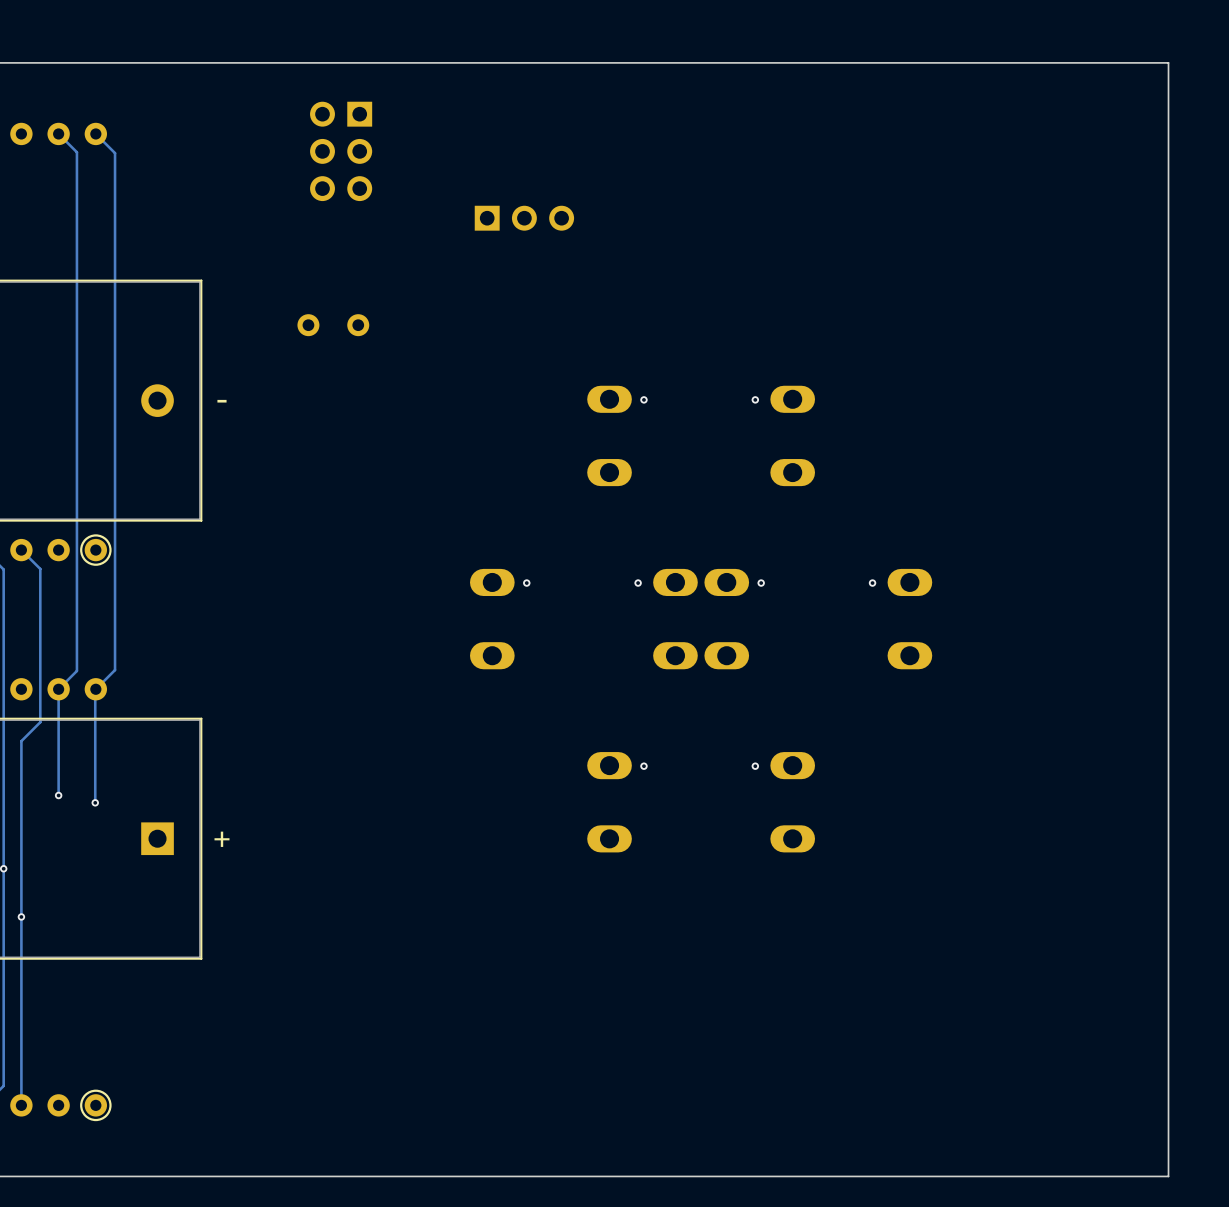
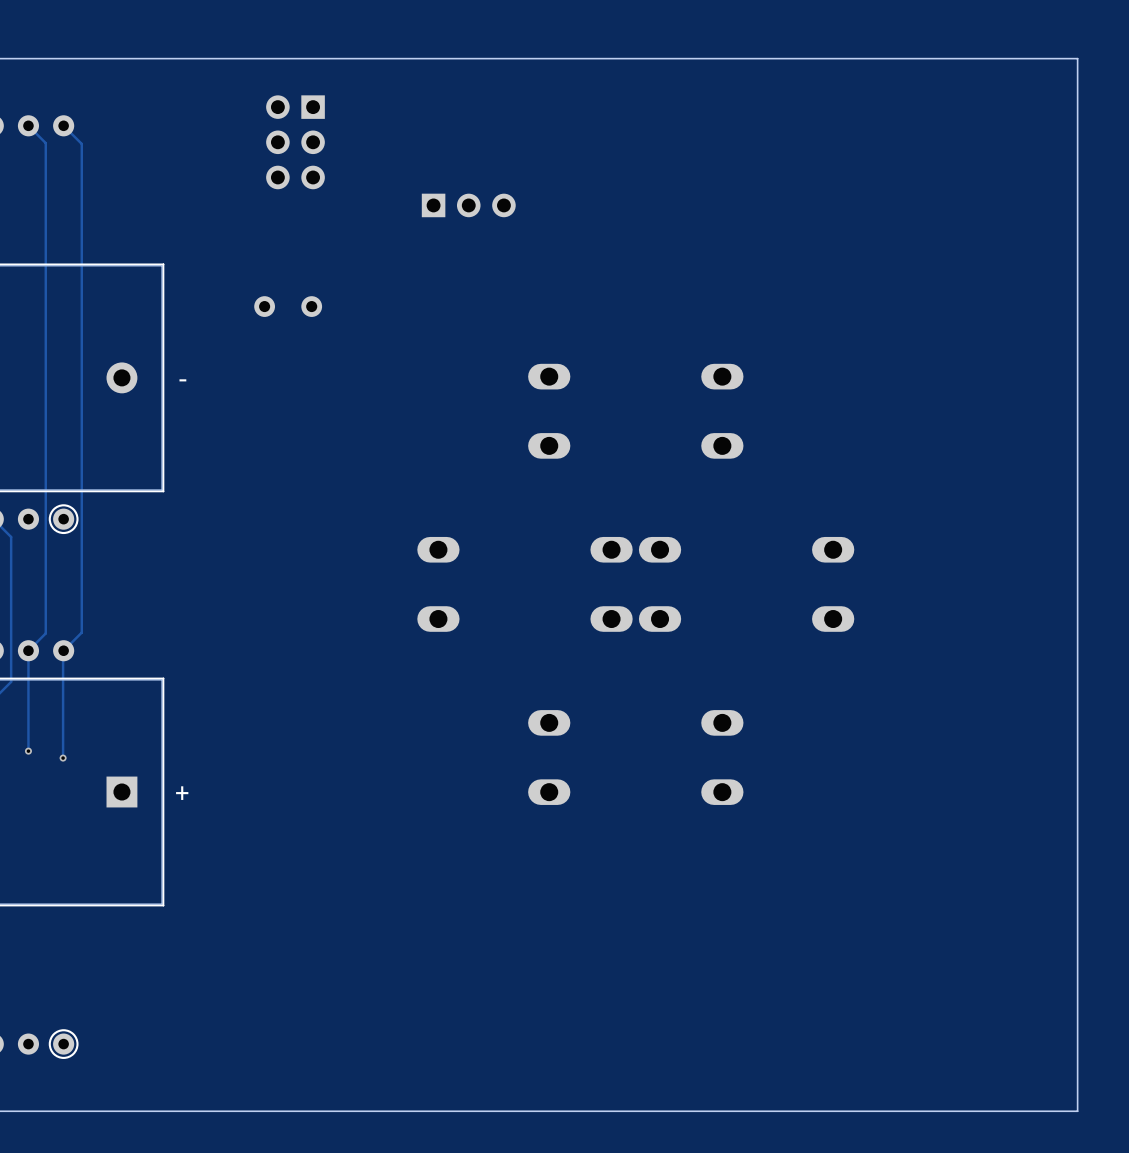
via: (643, 399) -> none
via: (755, 399) -> none
via: (526, 583) -> none
via: (638, 583) -> none
via: (761, 583) -> none
via: (872, 583) -> none
via: (643, 766) -> none
via: (755, 766) -> none

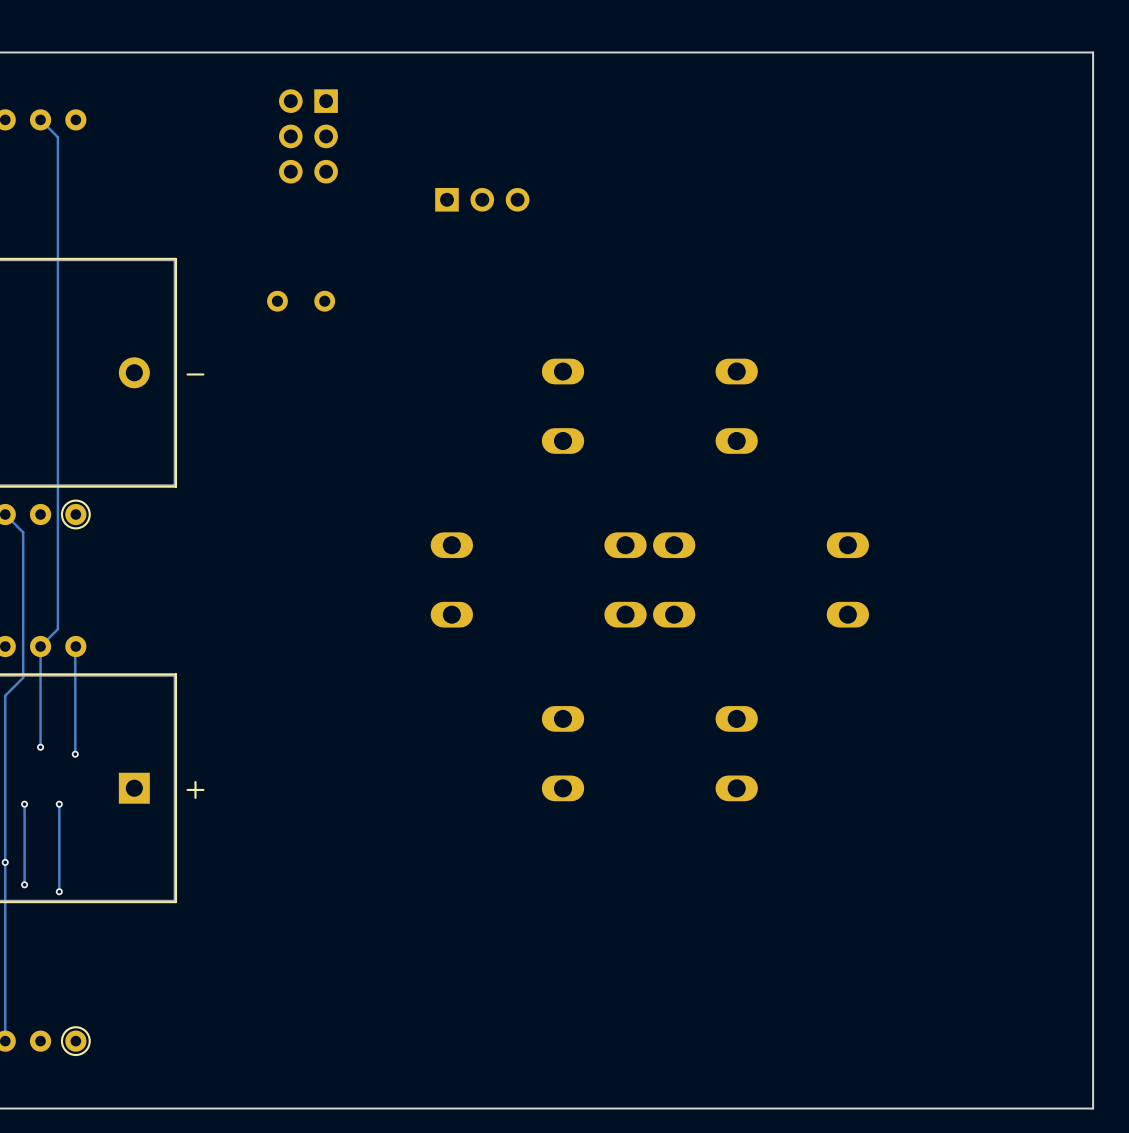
track: (63, 125) (81, 143) (81, 632) (63, 650) -> none
track: none -> (24, 804) (24, 884)
via: none -> (24, 804)
track: none -> (59, 804) (59, 891)
via: none -> (59, 804)
via: none -> (24, 884)
via: none -> (59, 891)

